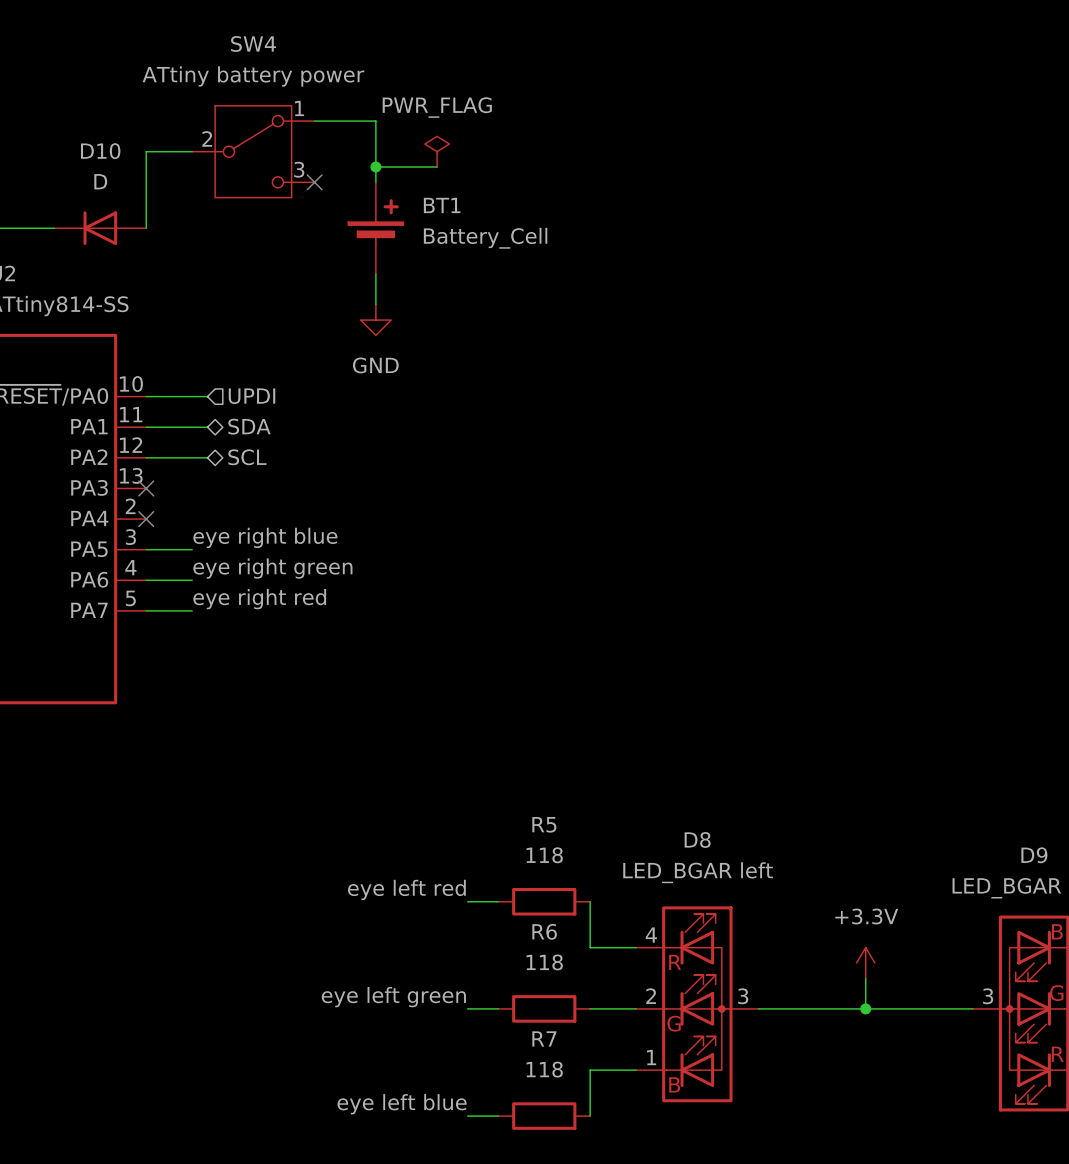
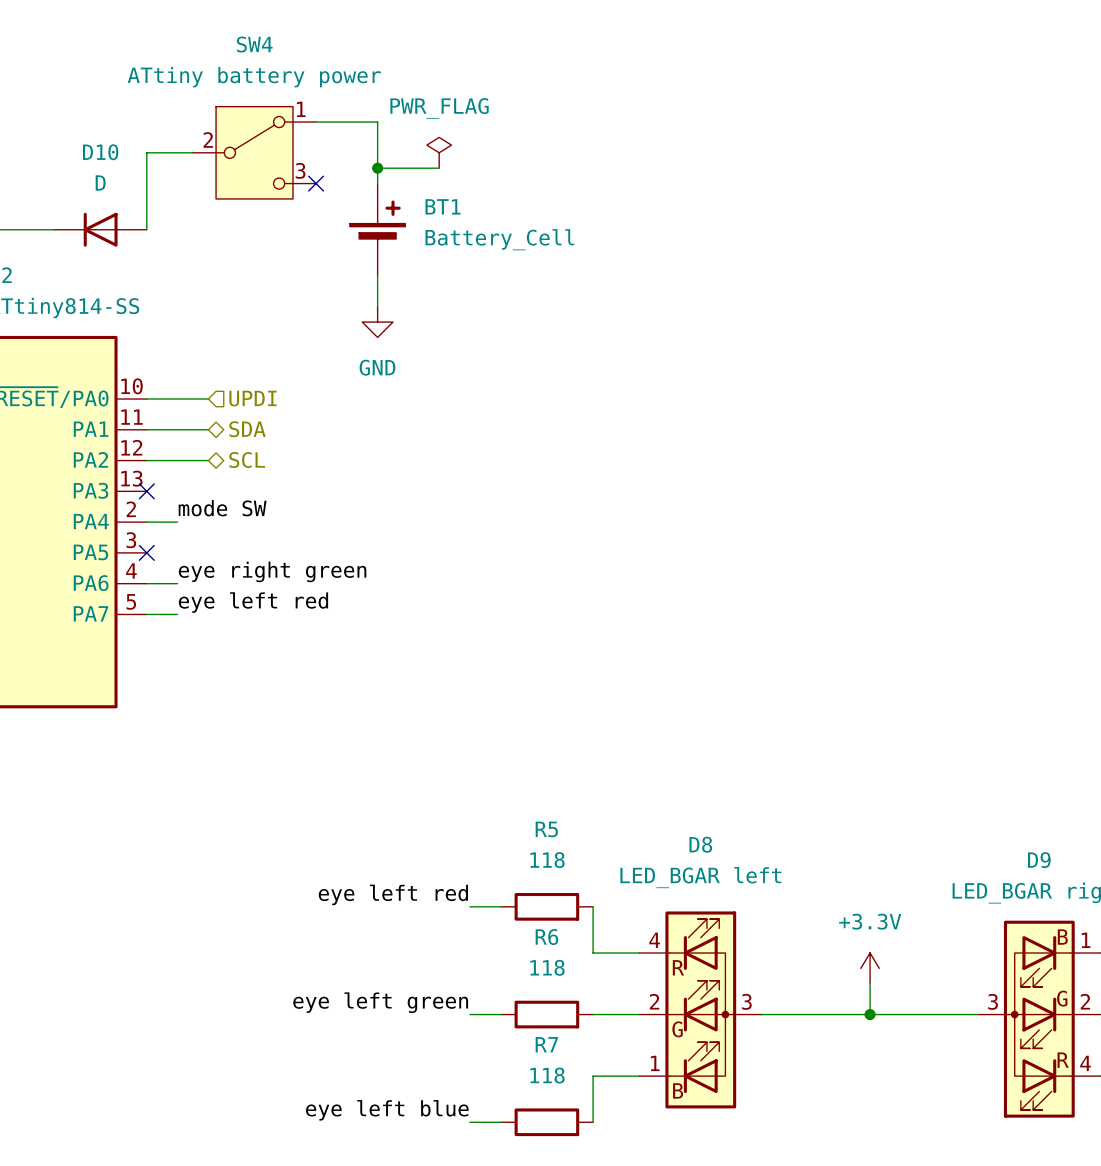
label: none -> mode SW (222, 508)
wire: none -> (146, 522) (177, 522)
no-connect mark position: (146, 519) -> (146, 552)
label: eye right blue (265, 537) -> none
wire: (146, 549) (192, 549) -> none
label position: eye right green (272, 568) -> eye right green (272, 571)
wire: (176, 580) (192, 580) -> none
label: eye right red (259, 599) -> eye left red (253, 602)
wire: (176, 610) (192, 610) -> none

